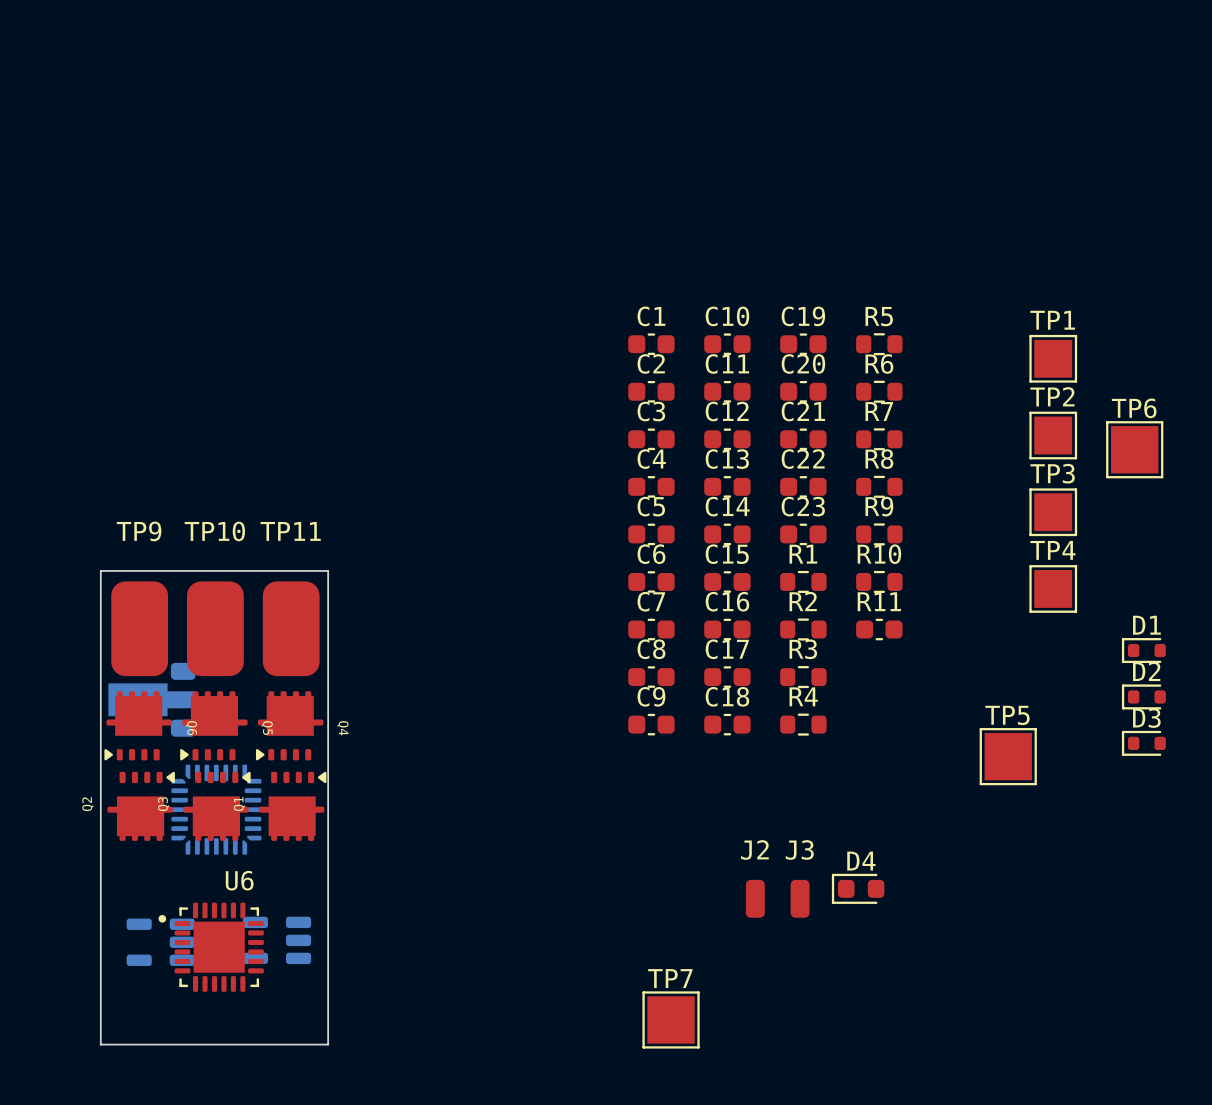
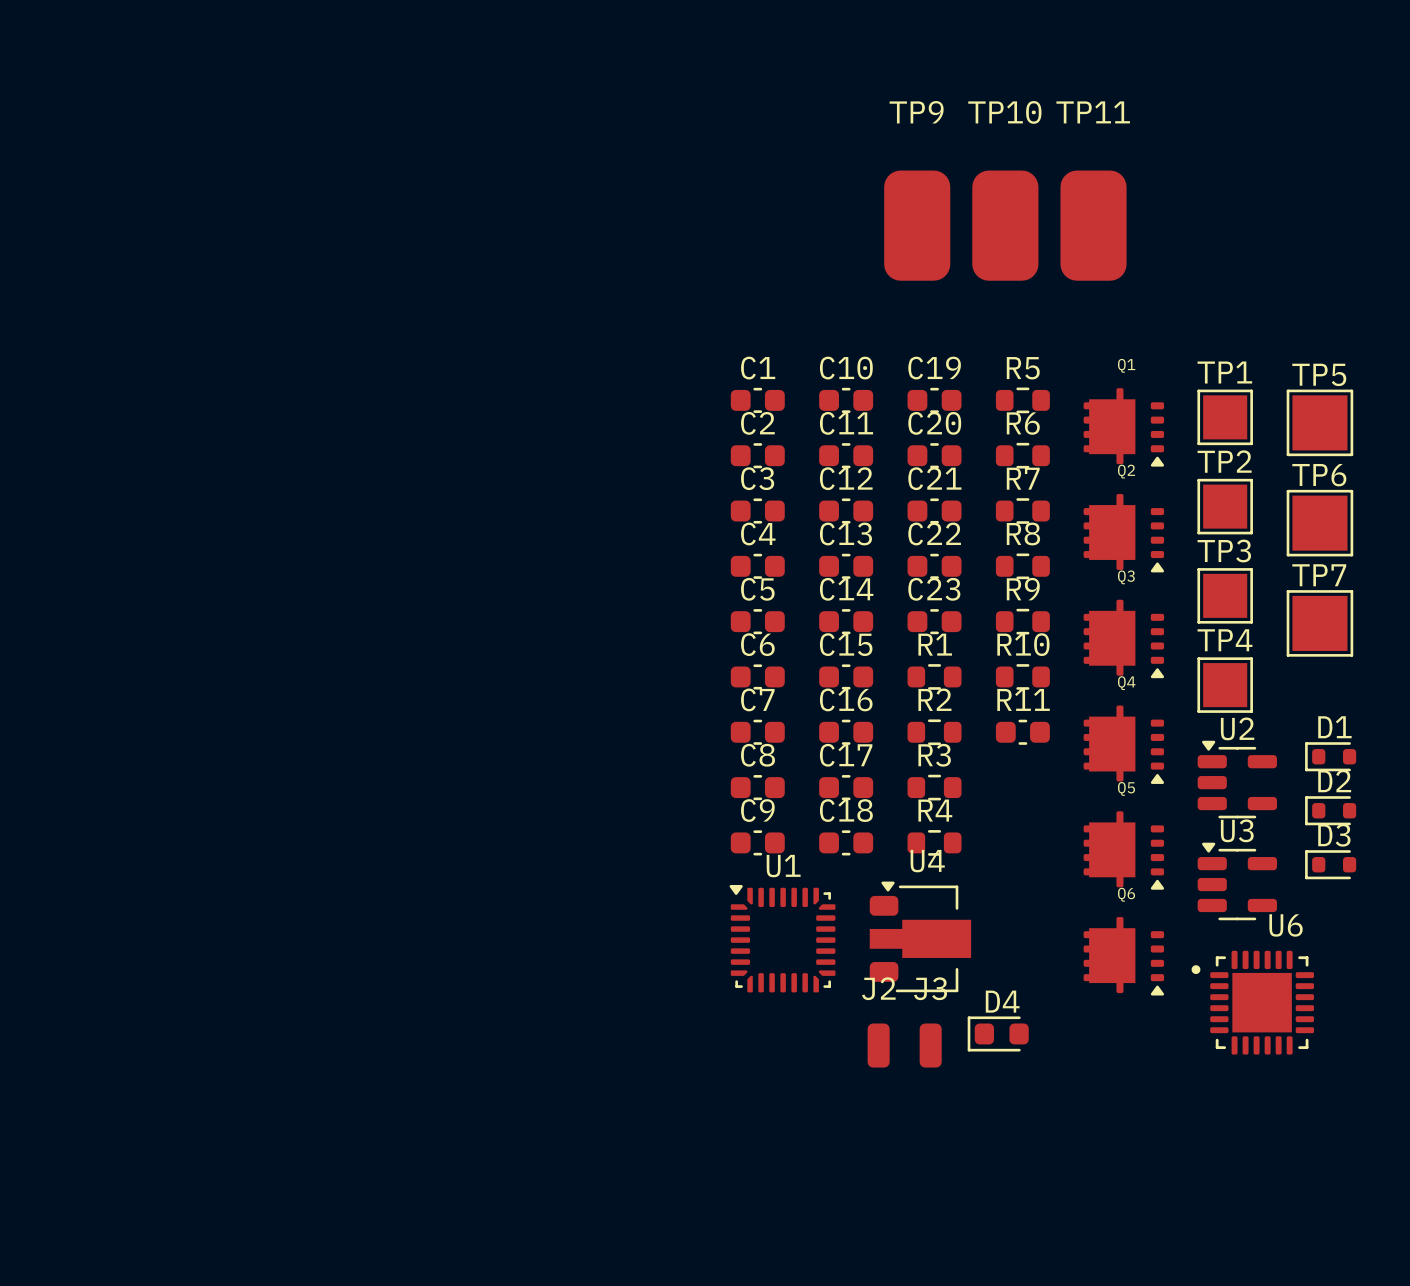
board edge: (100, 570) (328, 570) (328, 1044) (100, 1044) (100, 570) -> none
TP9 position: (139, 628) -> (917, 225)
TP10 position: (215, 628) -> (1005, 225)
TP11 position: (291, 628) -> (1093, 225)
U2: none -> (1237, 779)
part: (151, 699) -> none
Q6 rotation: 0° (138, 725) -> 90° counterclockwise (1123, 956)
Q6 position: (138, 725) -> (1123, 956)
Q5 rotation: 0° (213, 725) -> 90° counterclockwise (1123, 850)
Q5 position: (213, 725) -> (1123, 850)
Q4 rotation: 0° (289, 725) -> 90° counterclockwise (1123, 744)
Q4 position: (289, 725) -> (1123, 744)
TP5 position: (1008, 756) -> (1319, 422)
U3: none -> (1237, 881)
U4: none -> (920, 936)
Q2 rotation: 0° (141, 806) -> 90° clockwise (1123, 533)
Q2 position: (141, 806) -> (1123, 533)
Q3 rotation: 0° (216, 806) -> 90° clockwise (1123, 638)
Q3 position: (216, 806) -> (1123, 638)
Q1 rotation: 0° (292, 806) -> 90° clockwise (1123, 427)
Q1 position: (292, 806) -> (1123, 427)
U1 side: bottom (216, 809) -> top (782, 938)
part: (276, 940) -> none
part: (160, 942) -> none
U6 position: (211, 947) -> (1252, 1002)
TP7 position: (671, 1019) -> (1319, 623)

